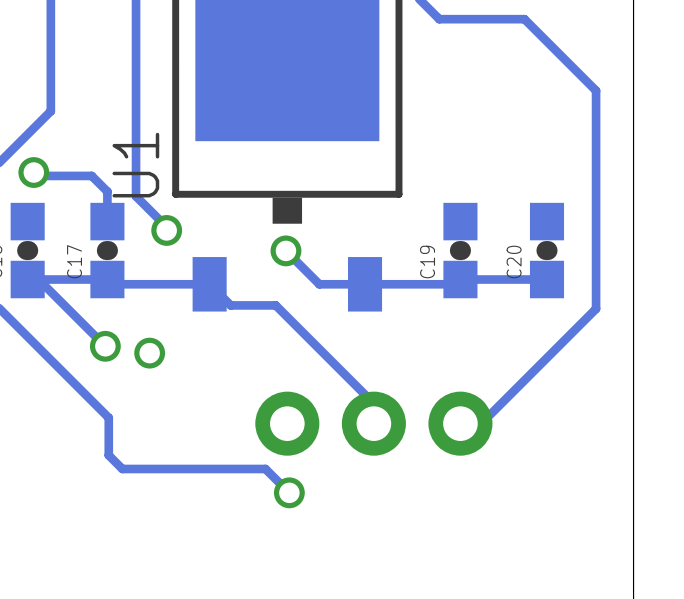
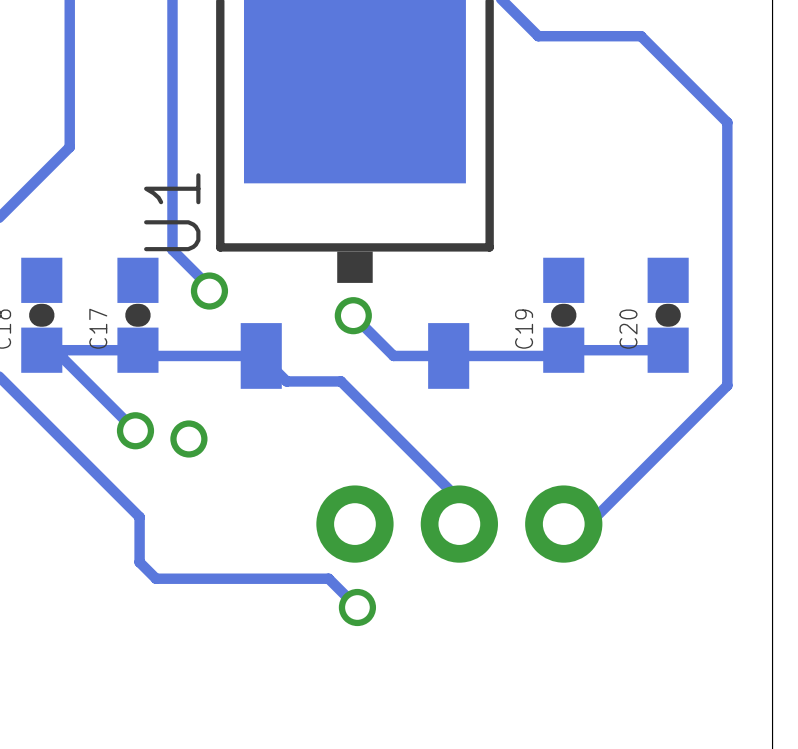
track: (33, 172) (37, 175) (91, 175) (107, 191) (107, 221) -> none
via: (33, 172) -> none

